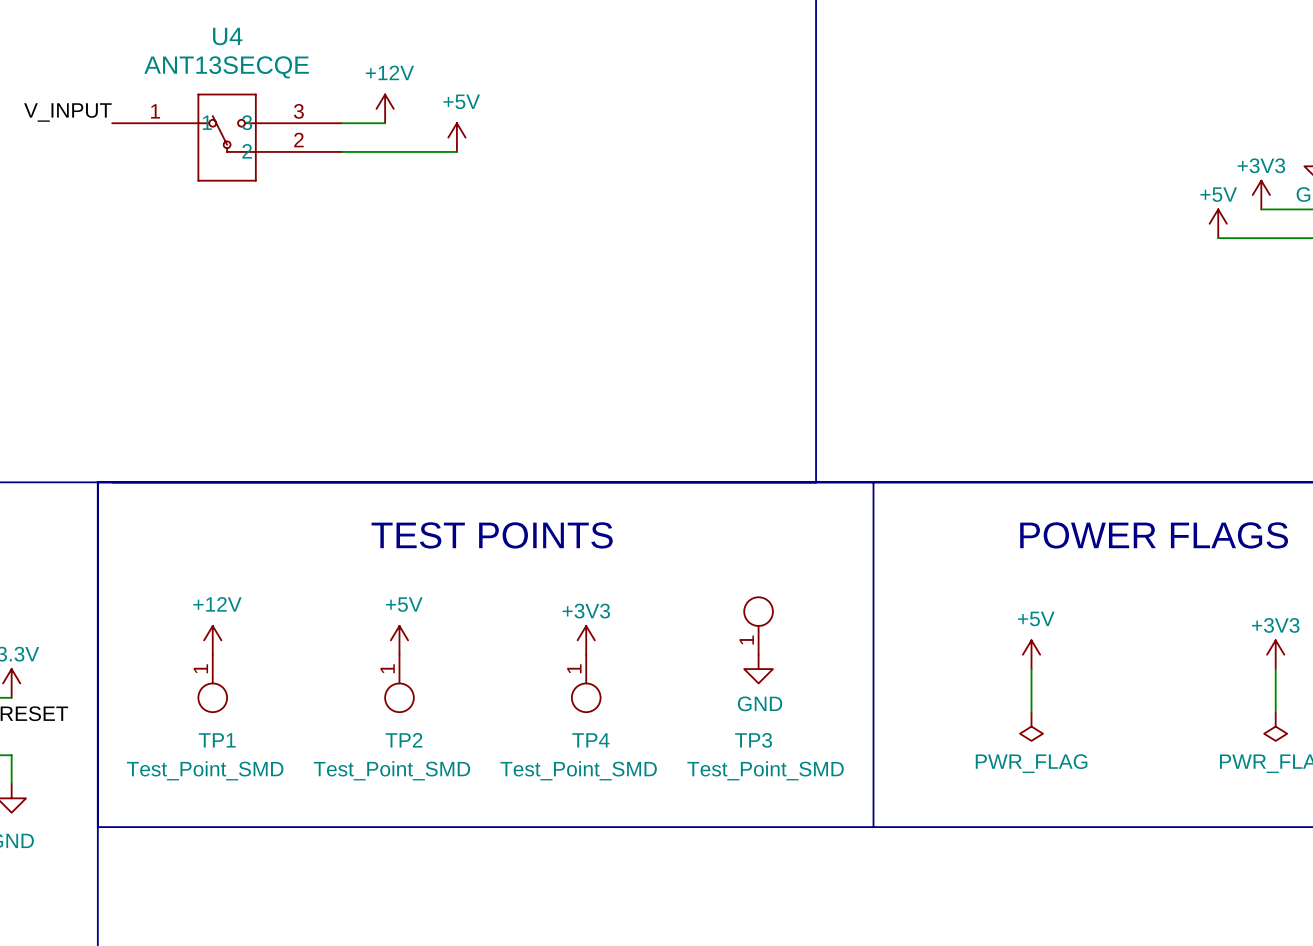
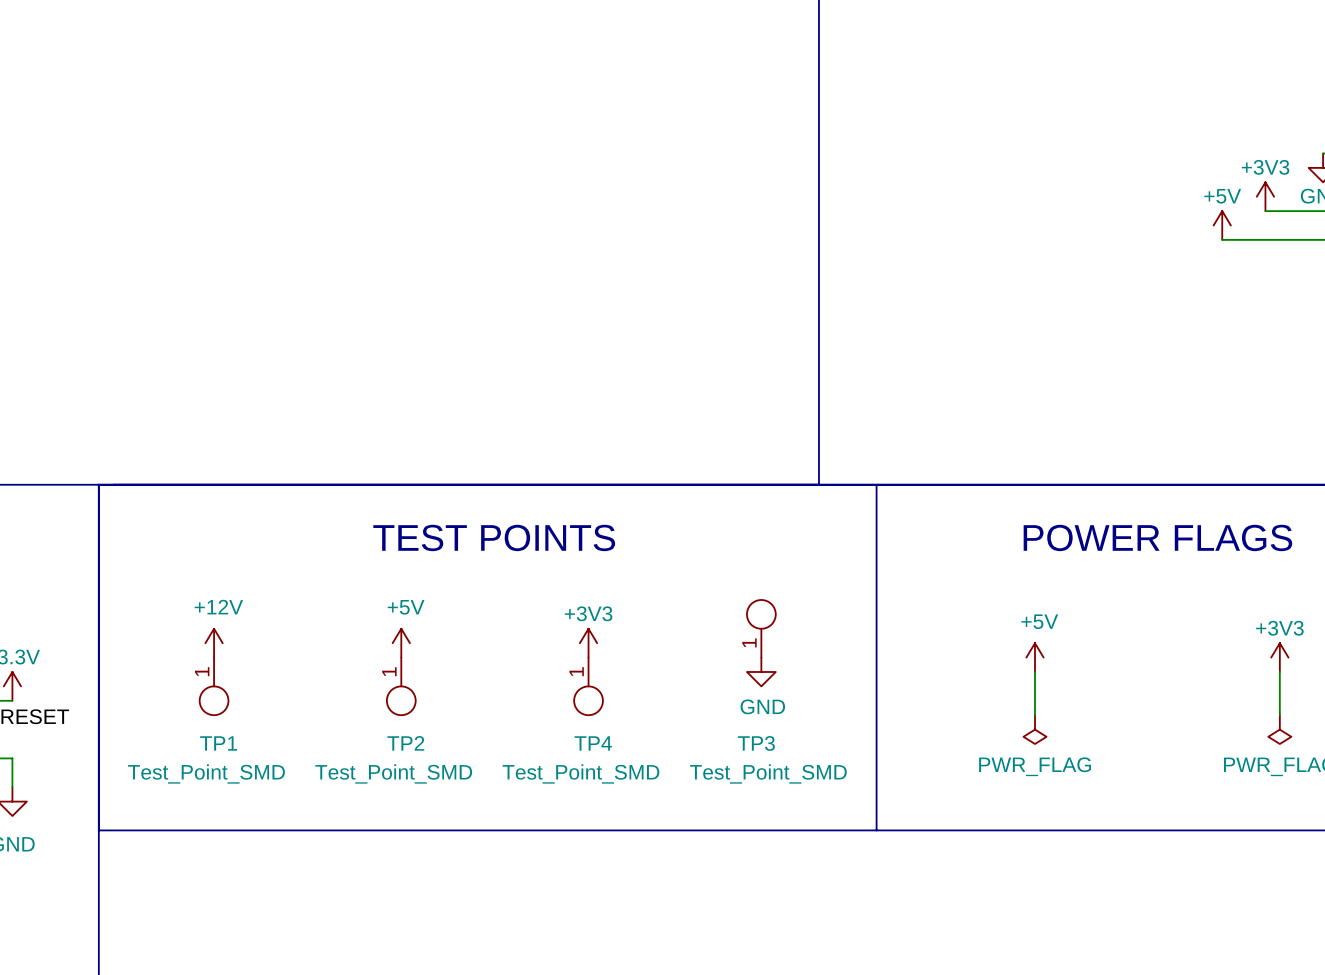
power symbol: +12V (385, 108) -> none
label: V_INPUT (67, 112) -> none
wire: (342, 123) (385, 123) -> none
U4: ANT13SECQE (227, 137) -> none
power symbol: +5V (456, 137) -> none
wire: (342, 151) (456, 151) -> none

